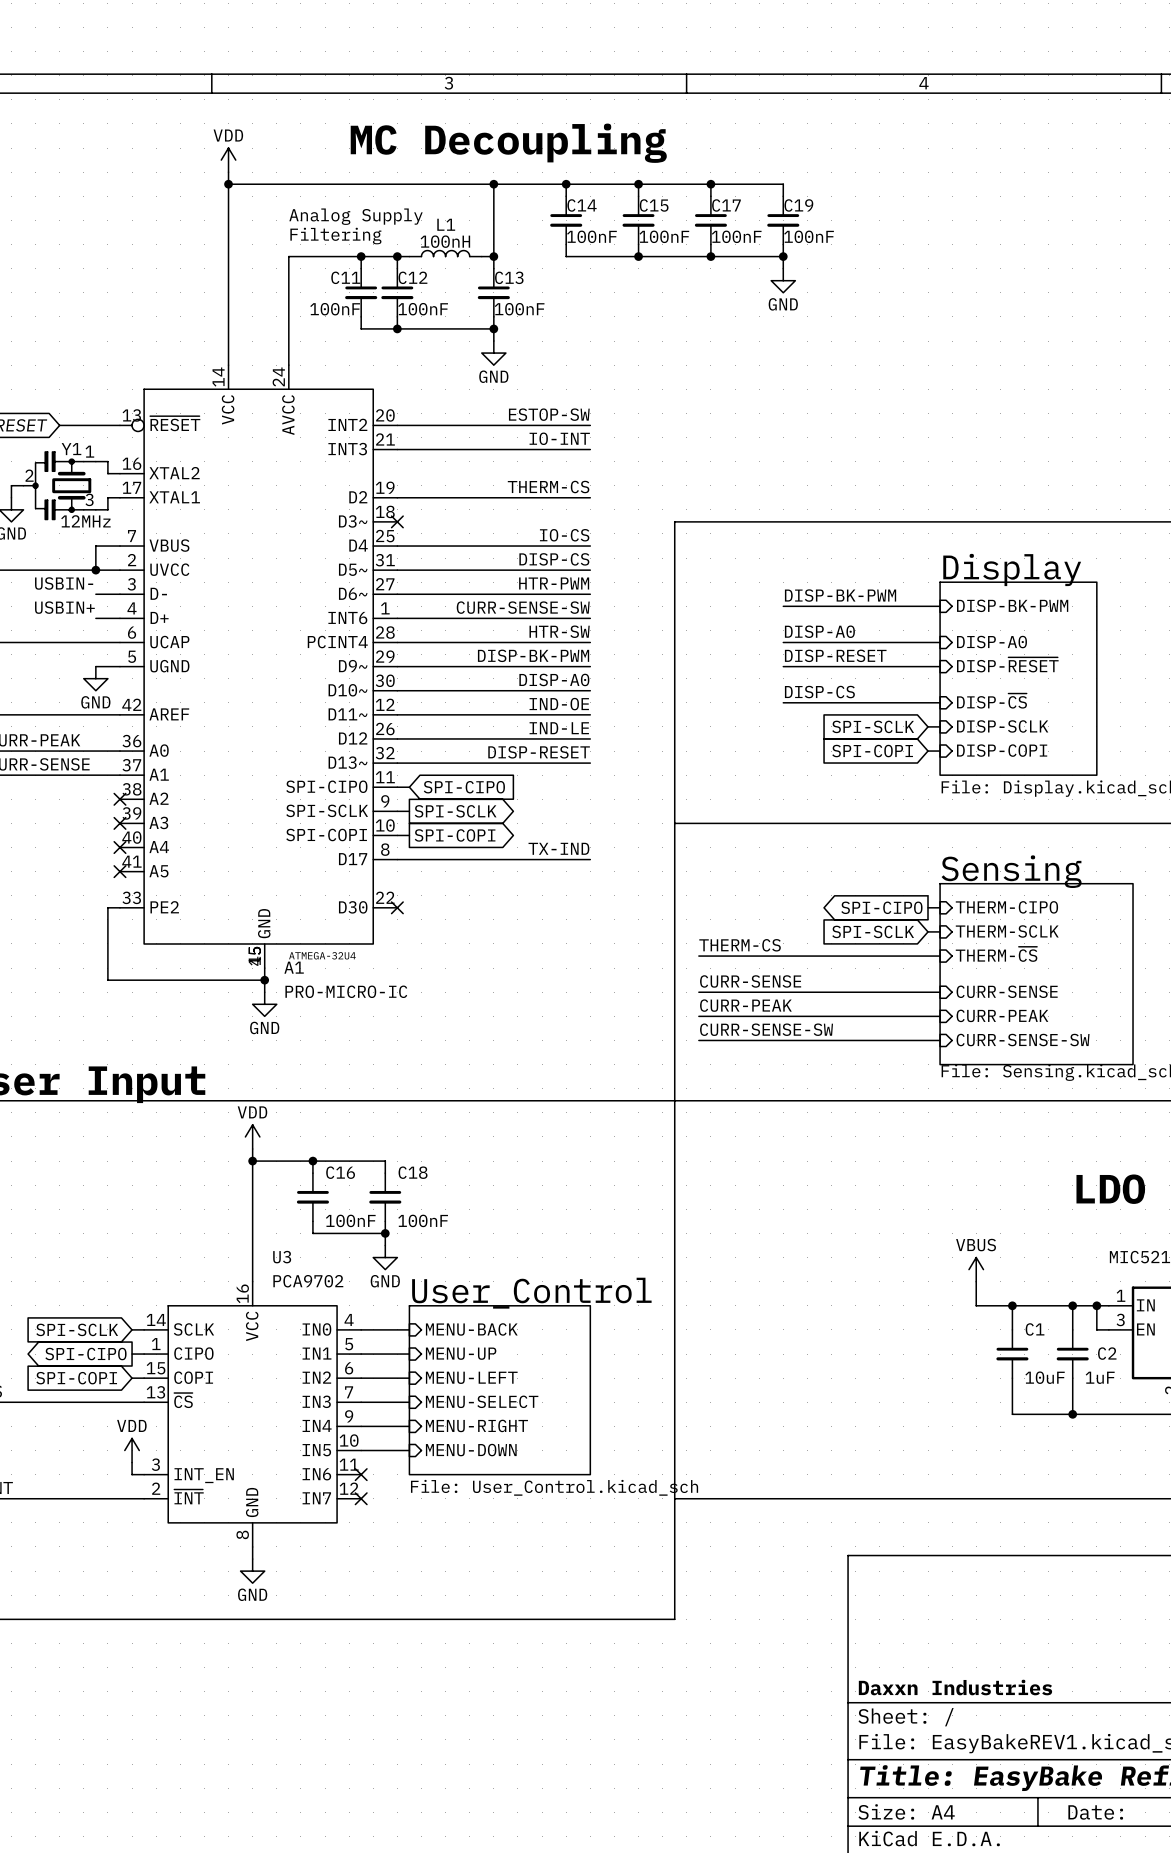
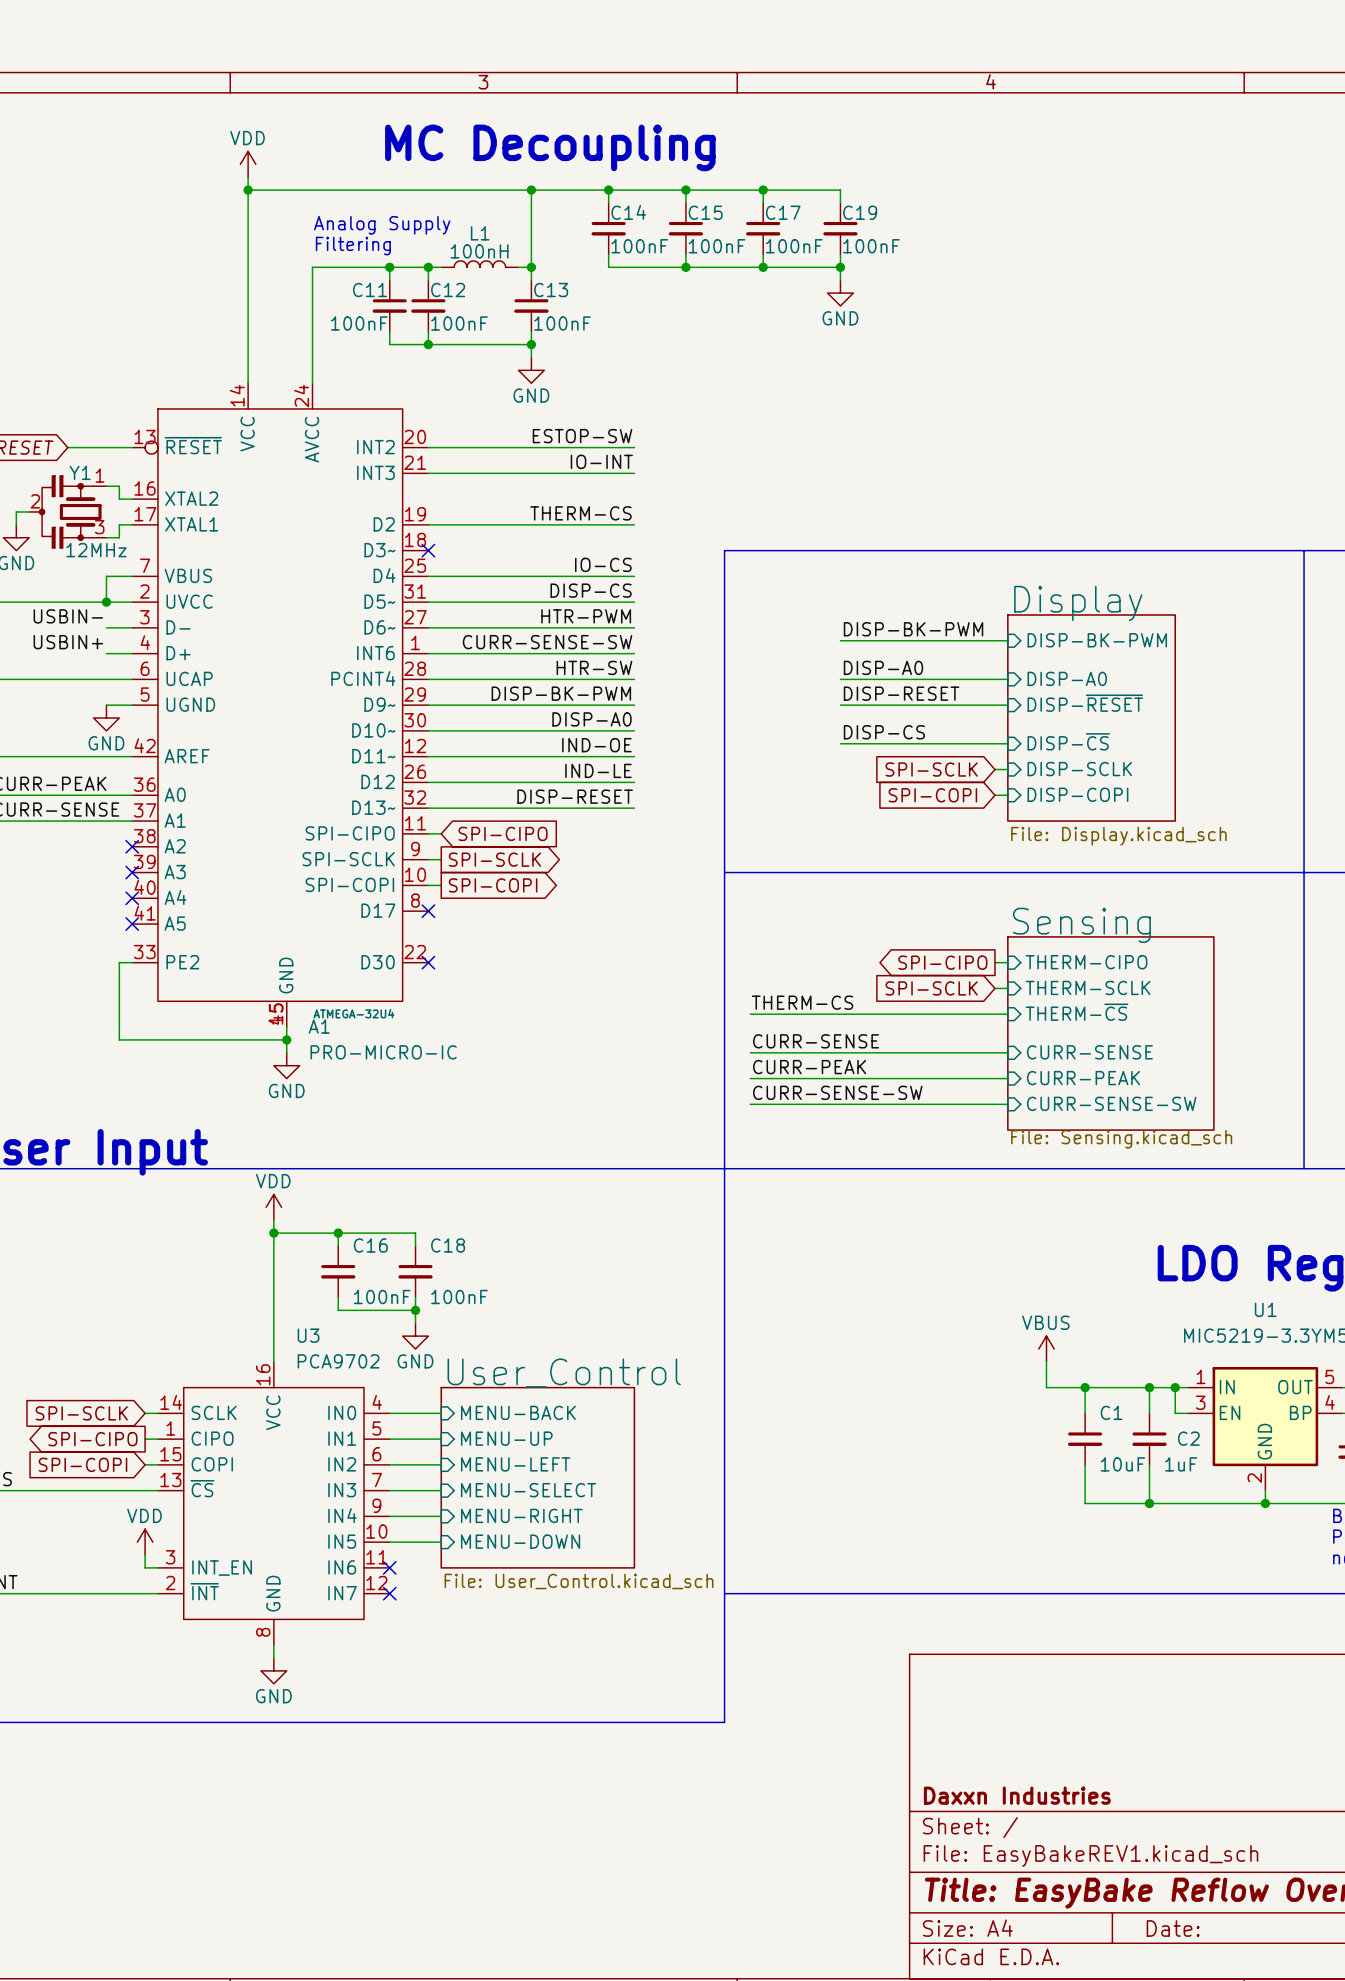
label: TX-IND (558, 848) -> none
wire: (397, 859) (590, 859) -> none
no-connect mark: none -> (428, 911)

